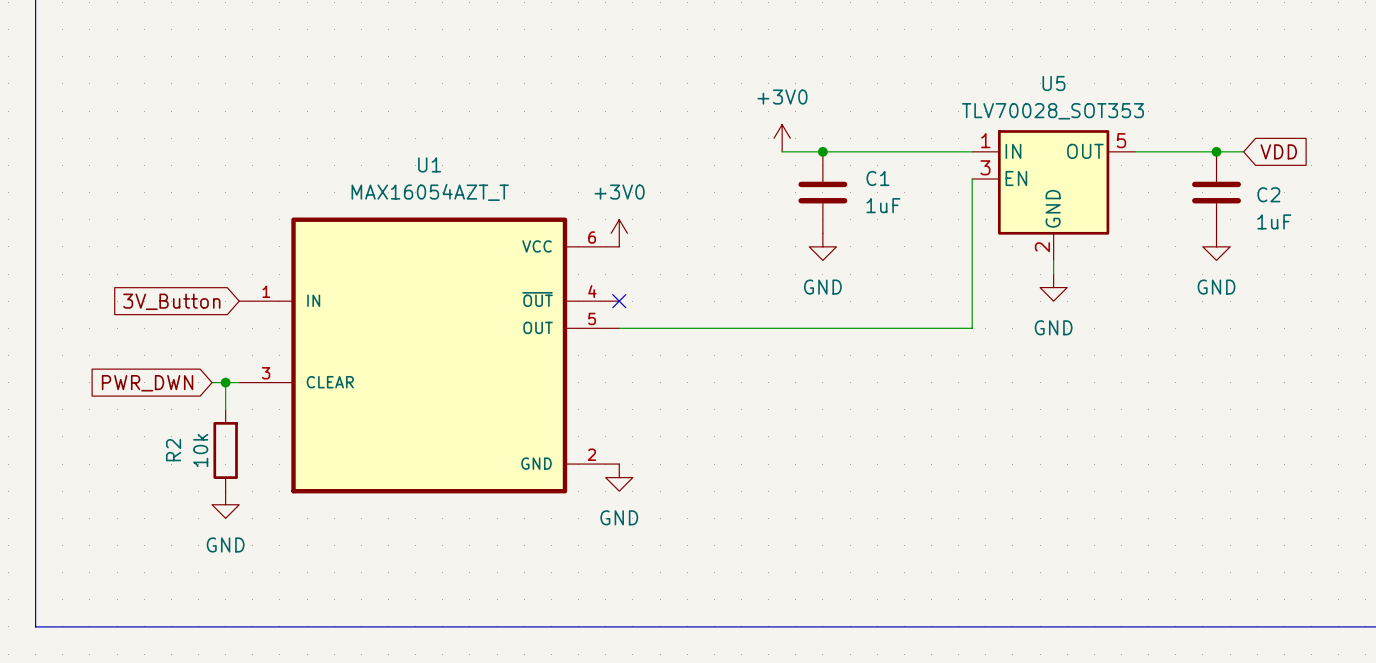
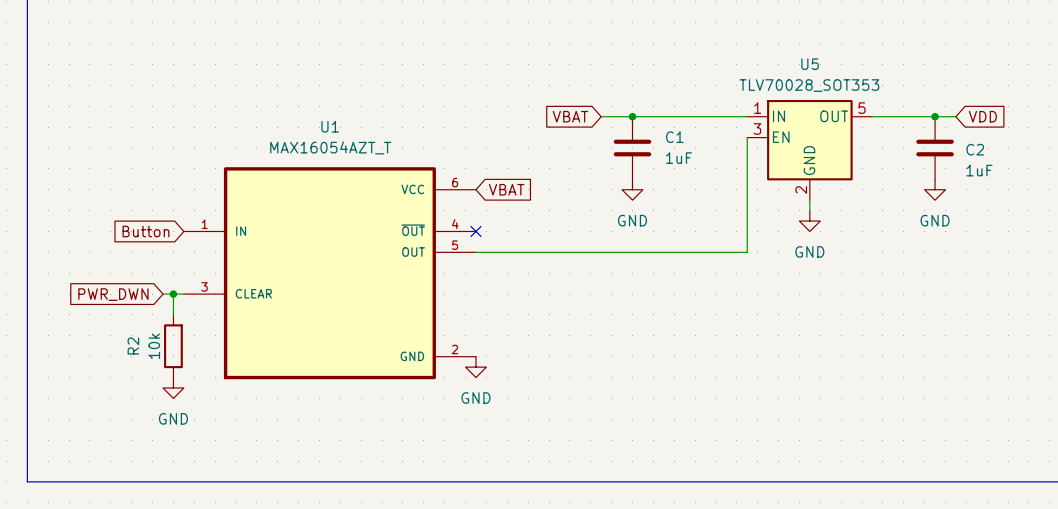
power symbol: +3V0 (782, 138) -> none
global label: none -> VBAT (570, 116)
power symbol: +3V0 (619, 233) -> none
global label: none -> VBAT (506, 189)
global label: 3V_Button (171, 301) -> Button (145, 231)

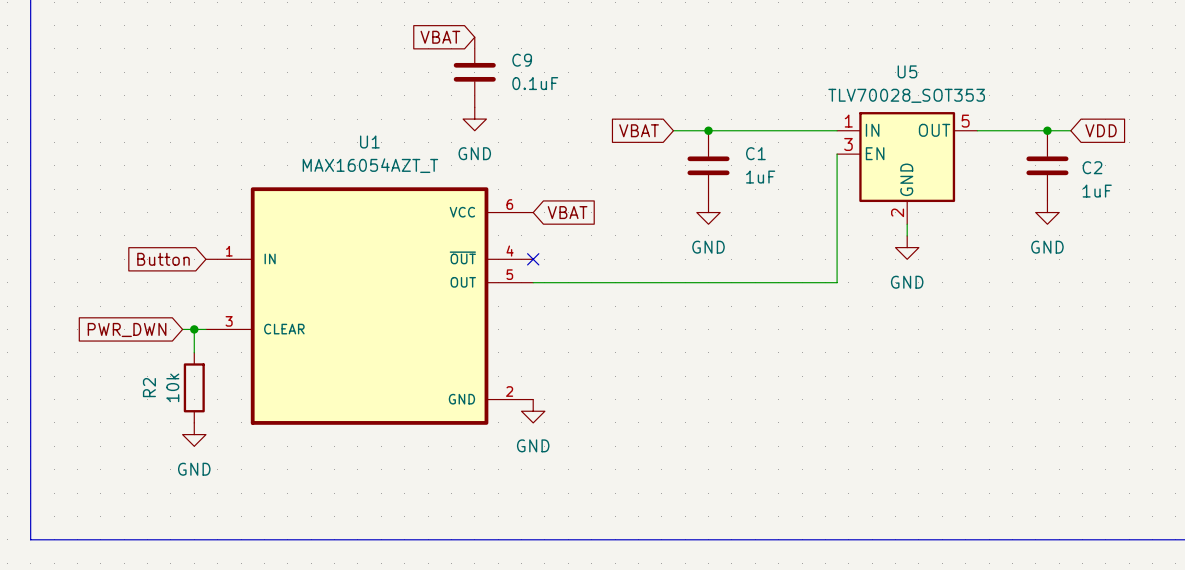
global label: none -> VBAT (440, 37)
C9: none -> 0.1uF (474, 72)
power symbol: none -> GND (474, 119)

